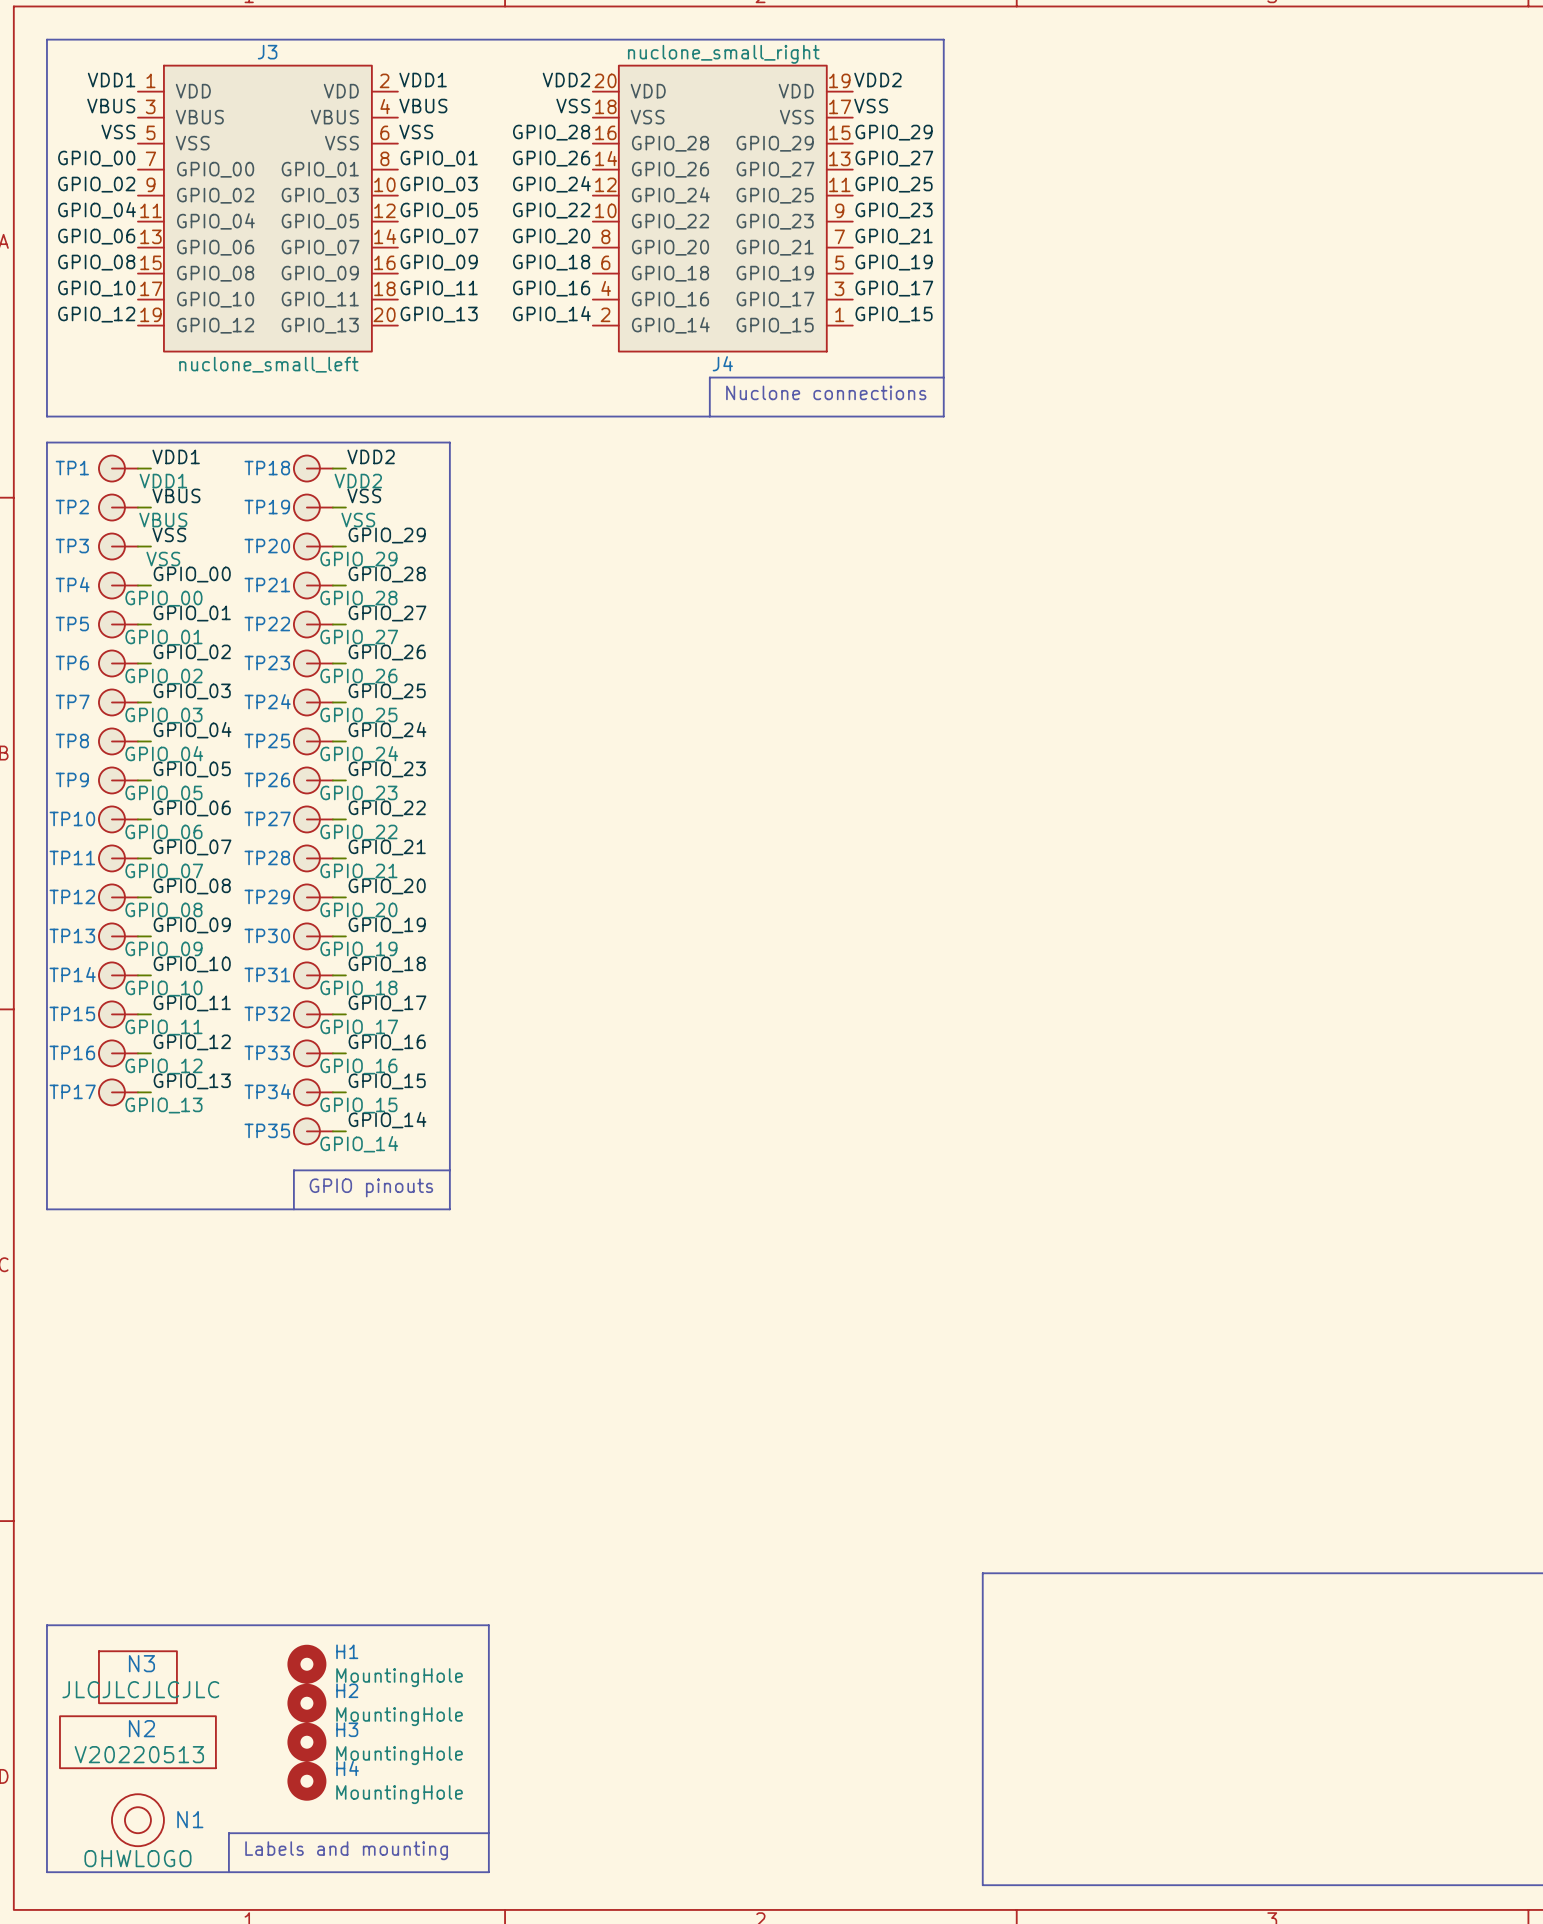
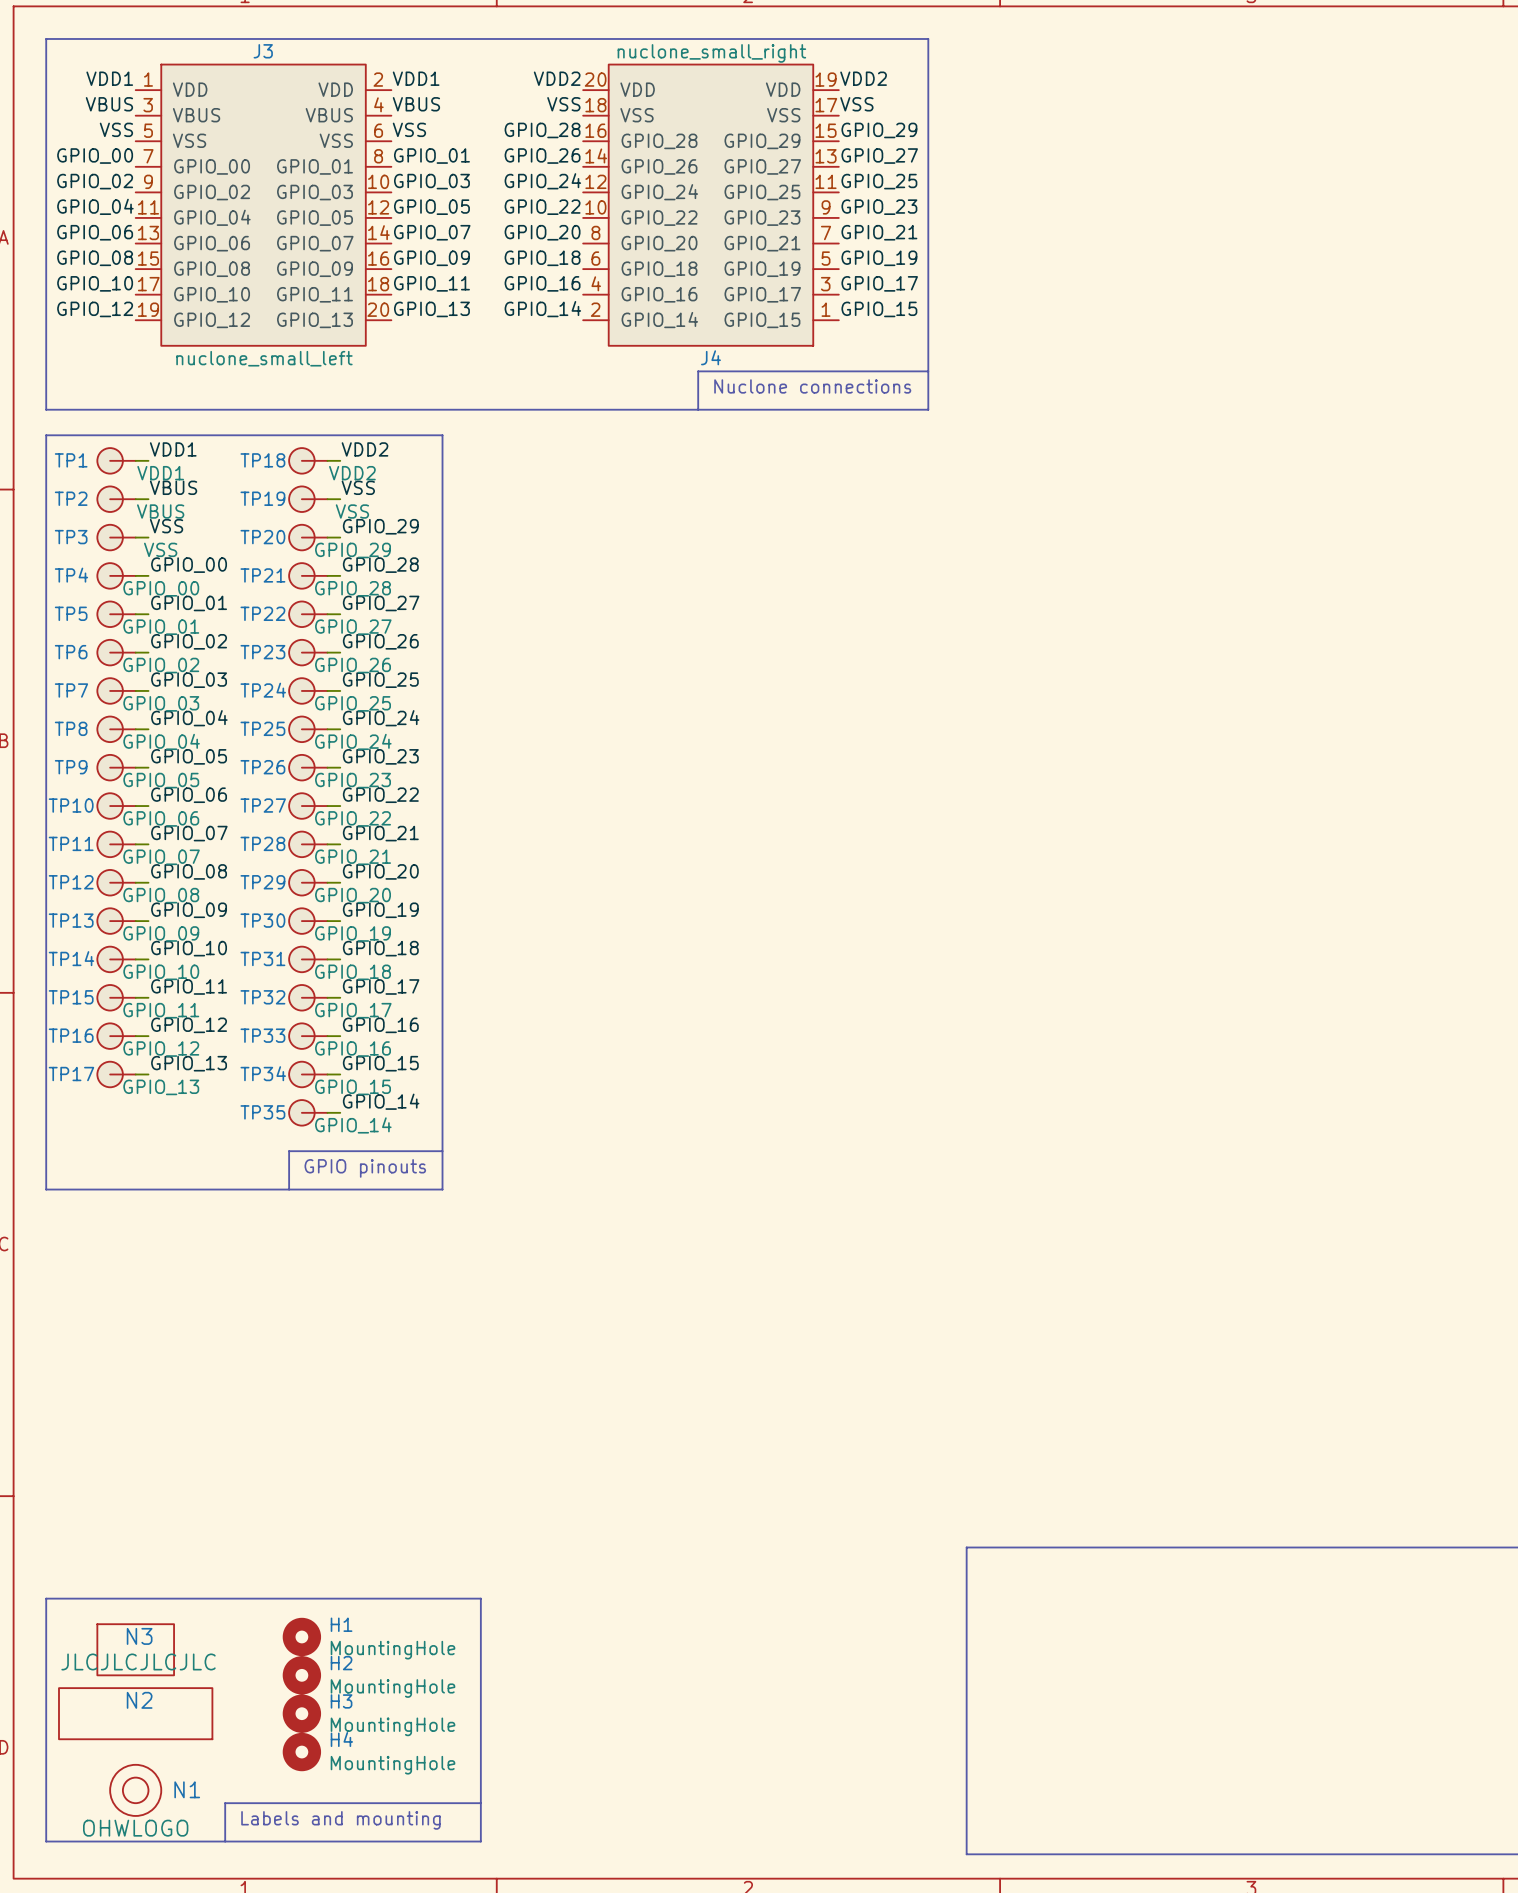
N2 value: V20220513 (139, 1754) -> none

